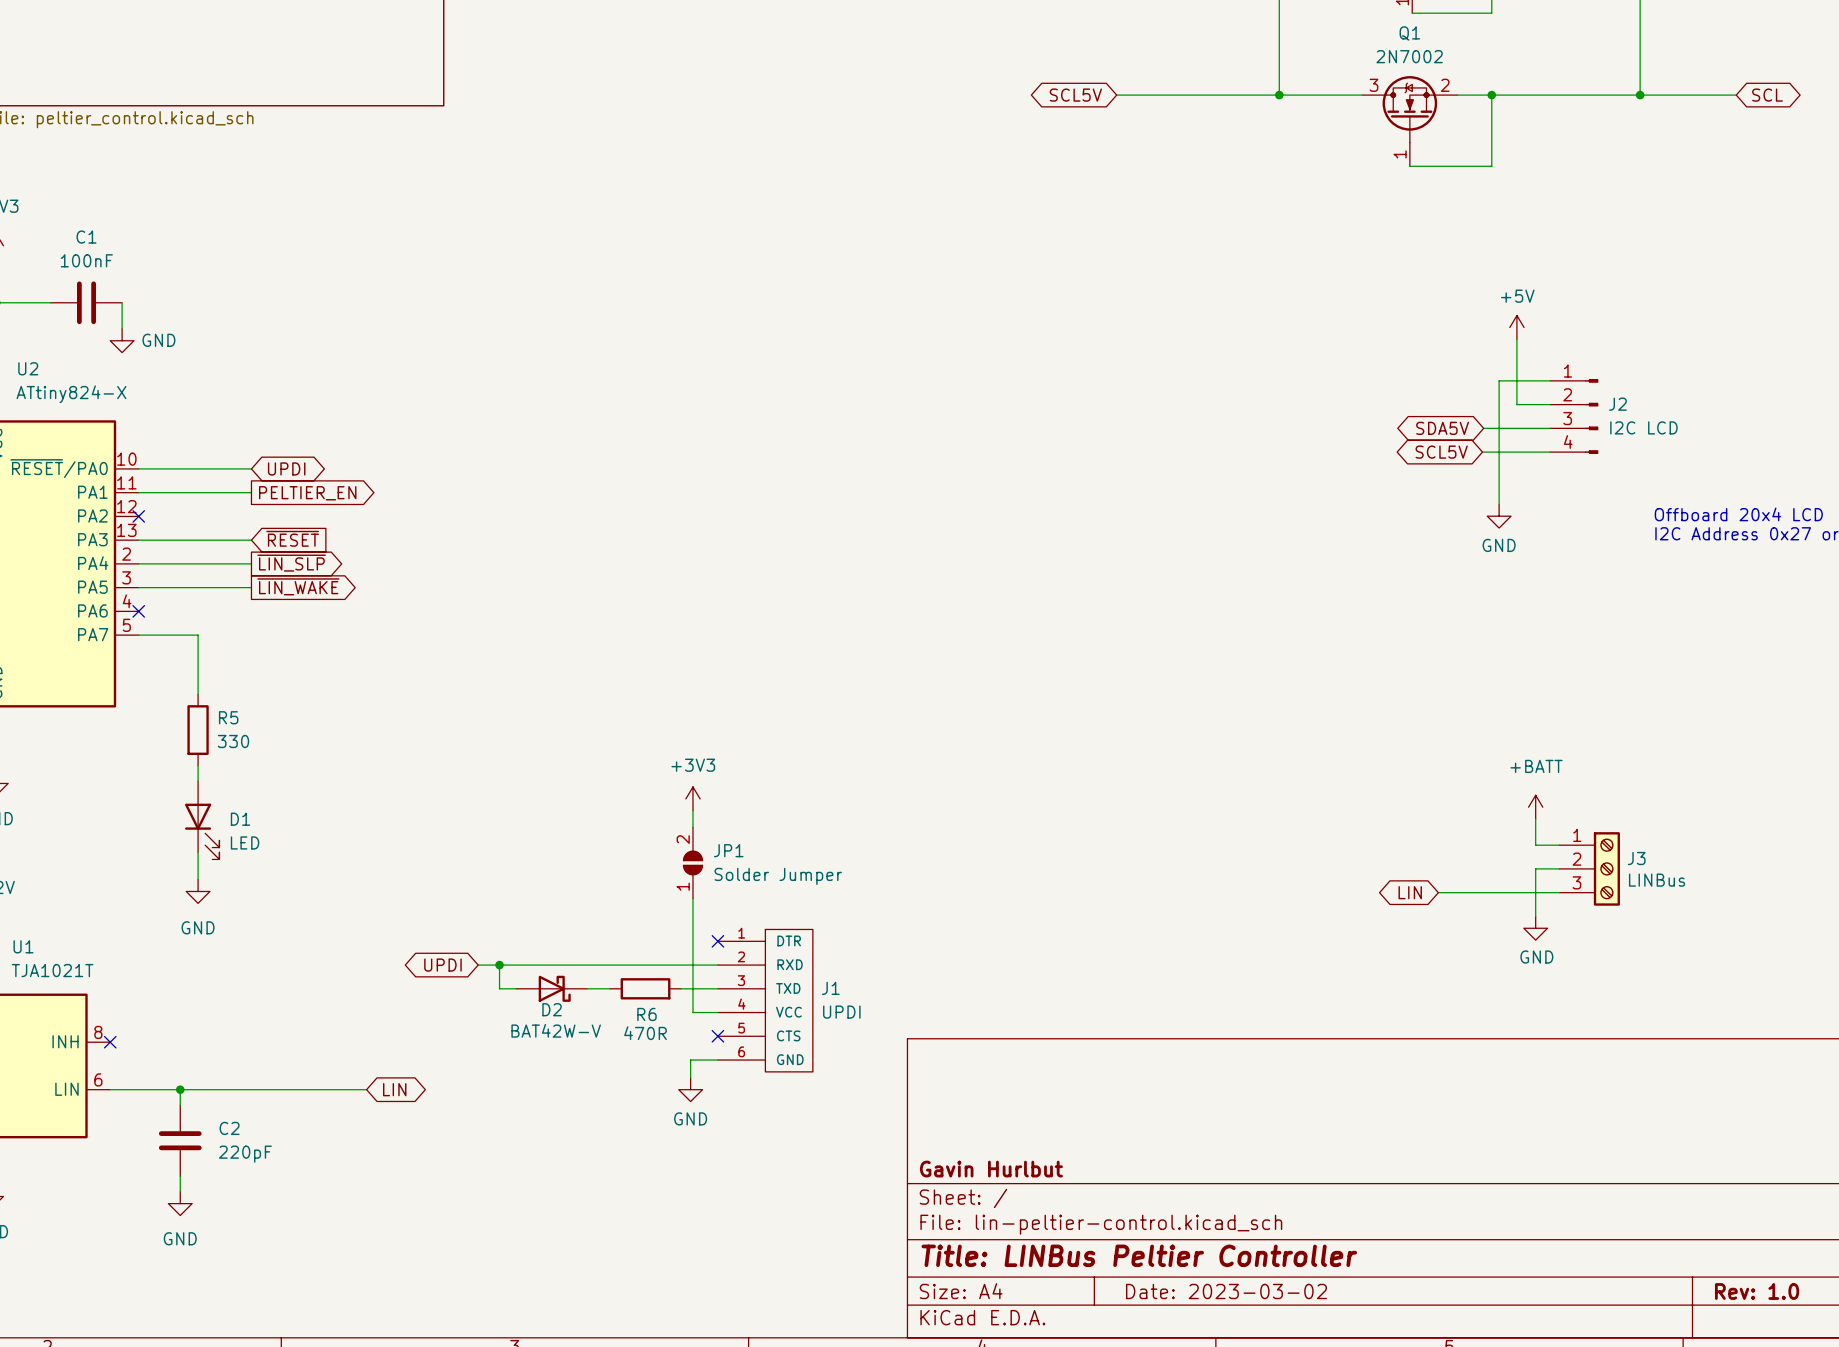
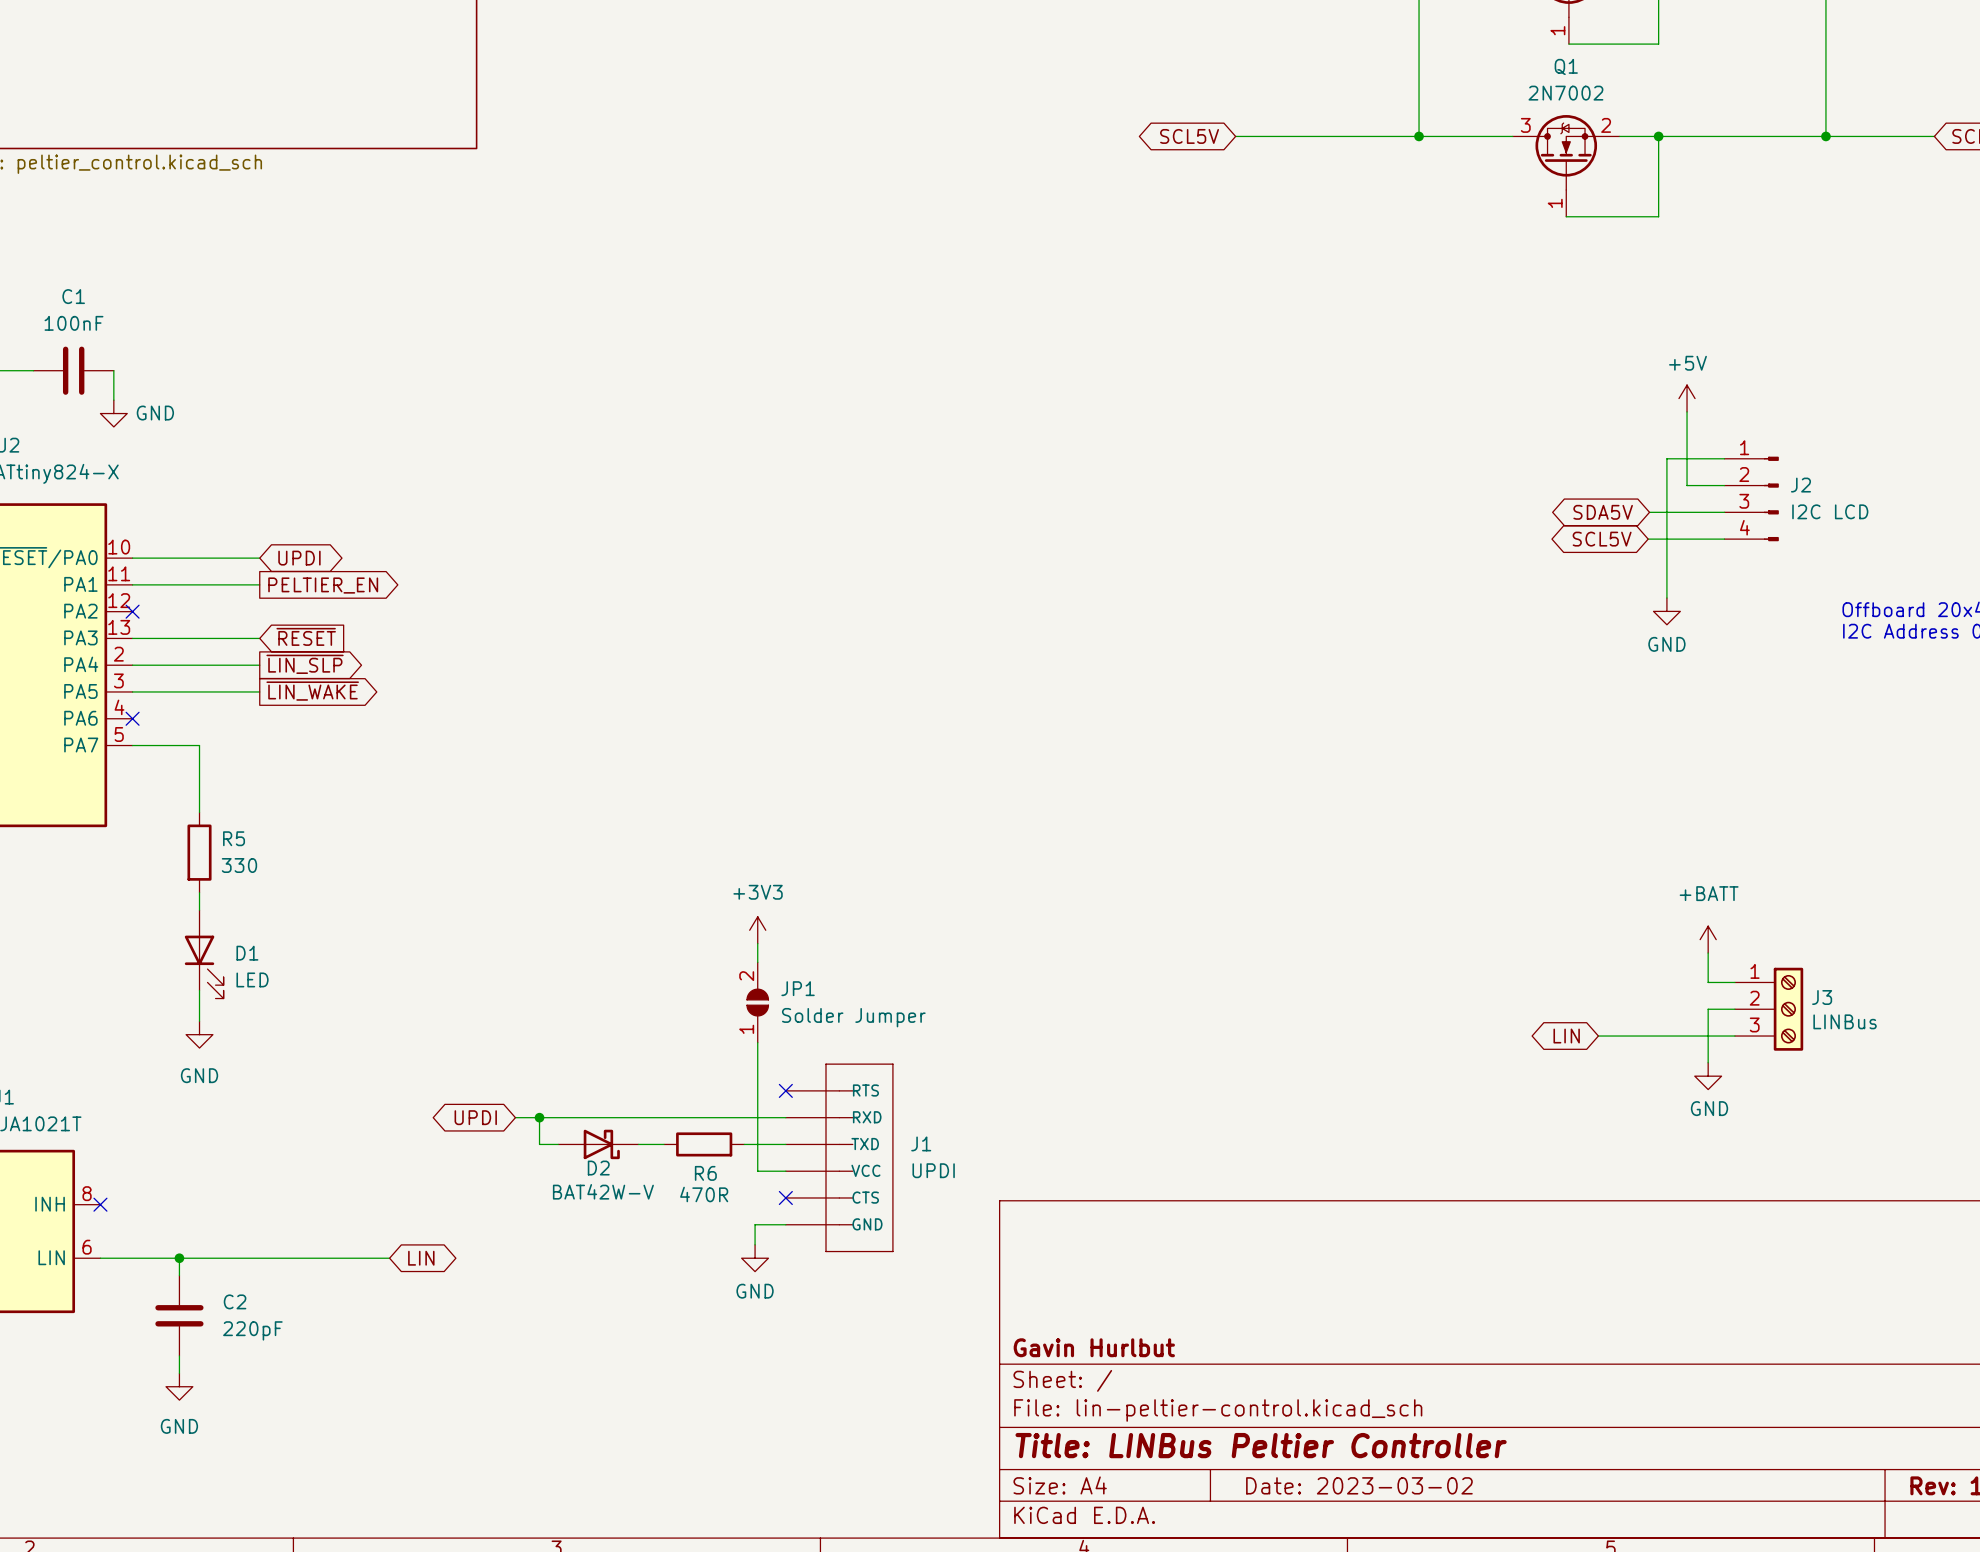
J1 symbol: [717, 929, 813, 1072] -> [785, 1064, 893, 1252]

